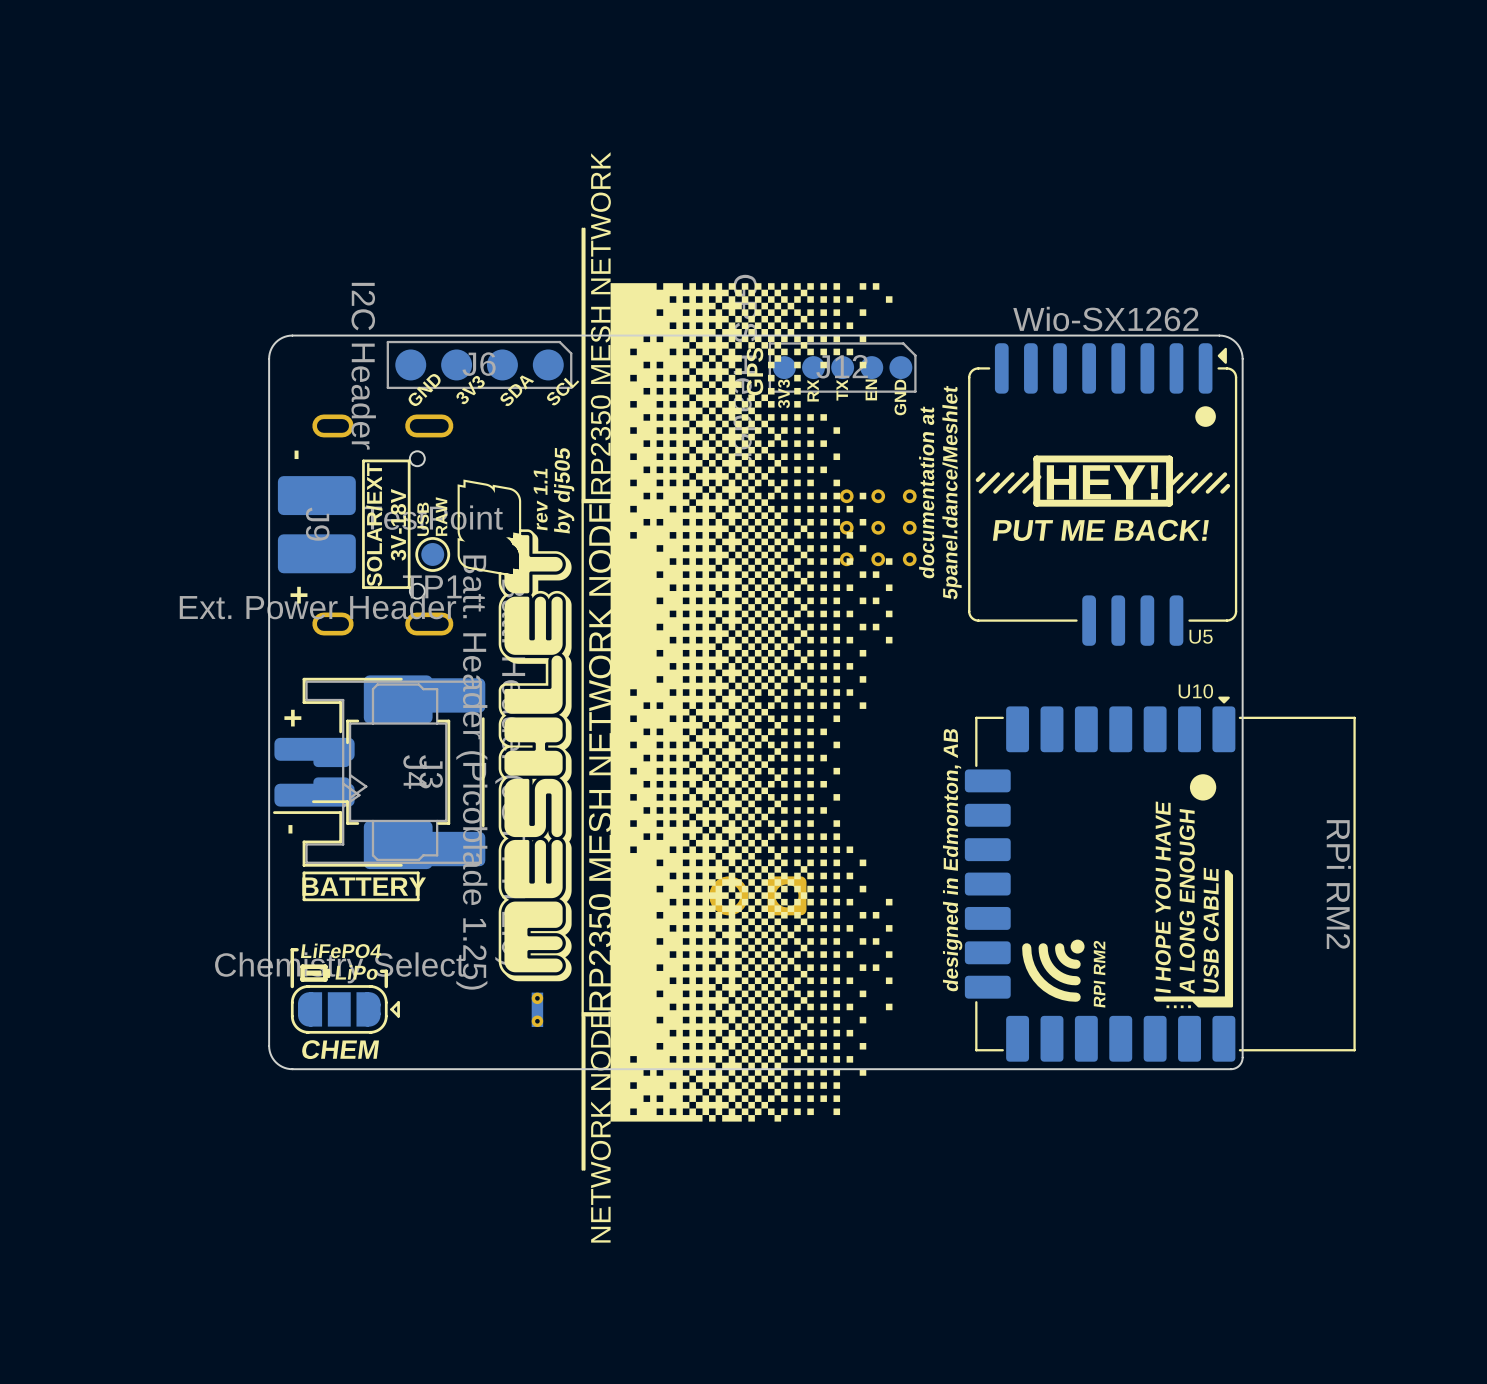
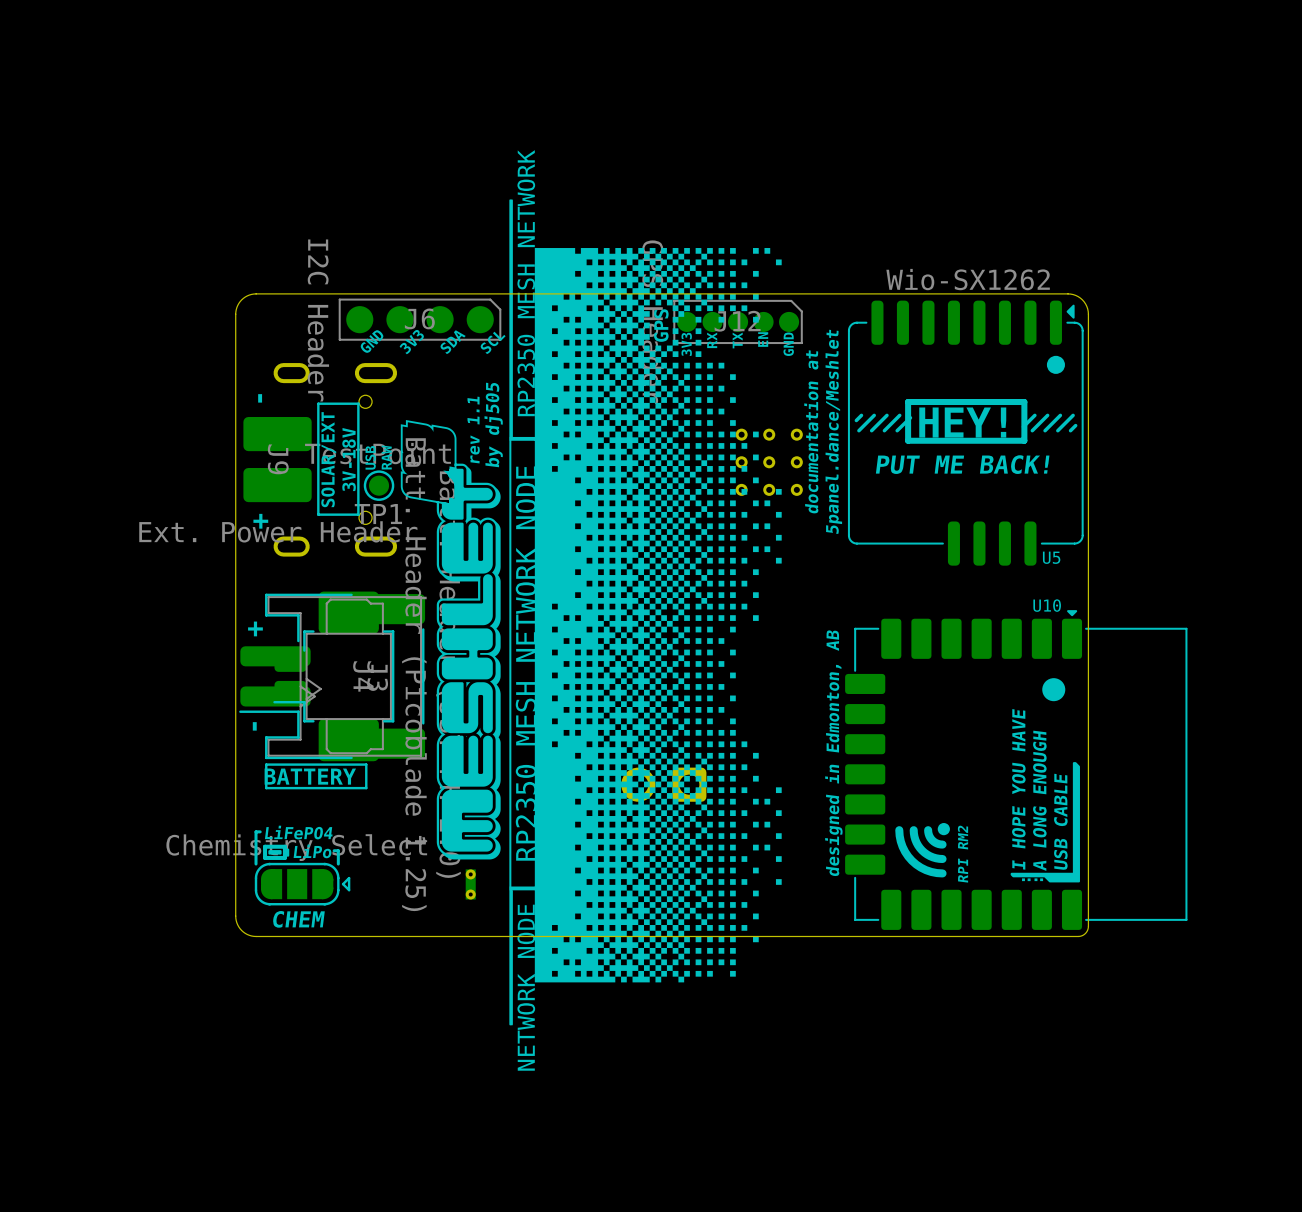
U10 value: RPi RM2 (1338, 884) -> none

